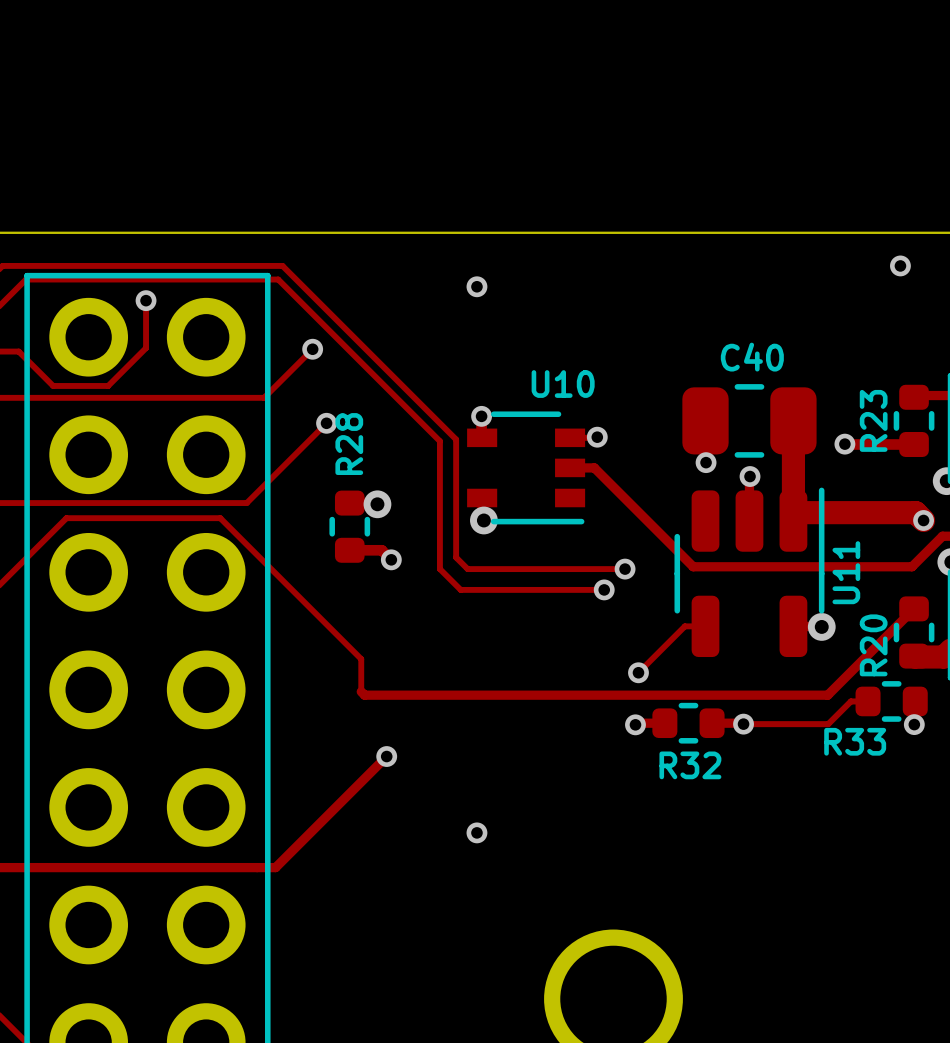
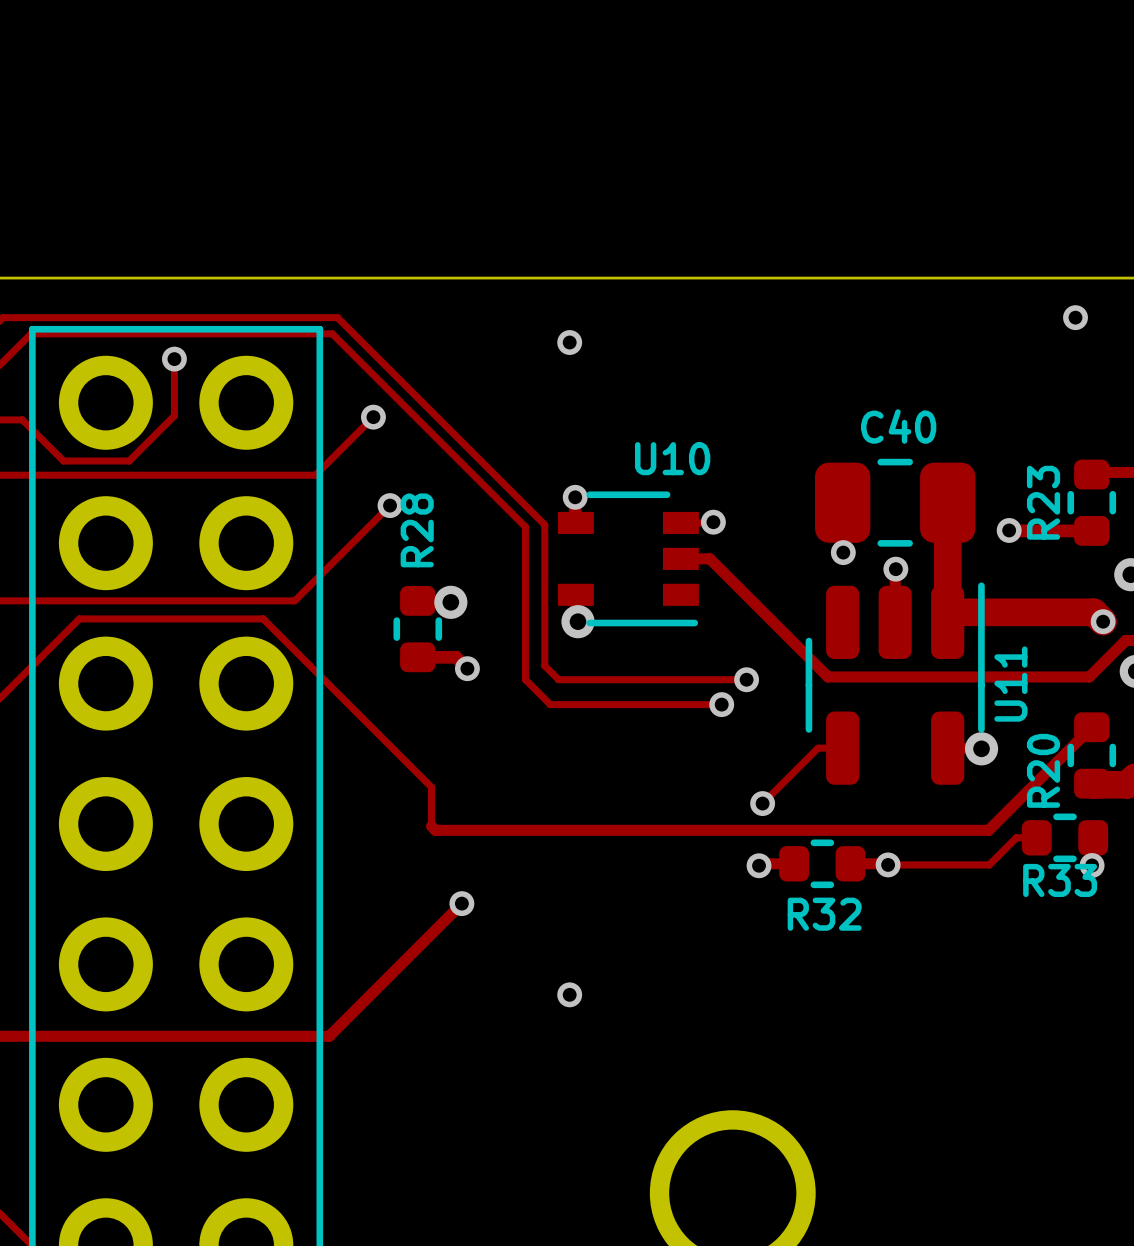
R33 name position: R33 (855, 741) -> R33 (1060, 880)

